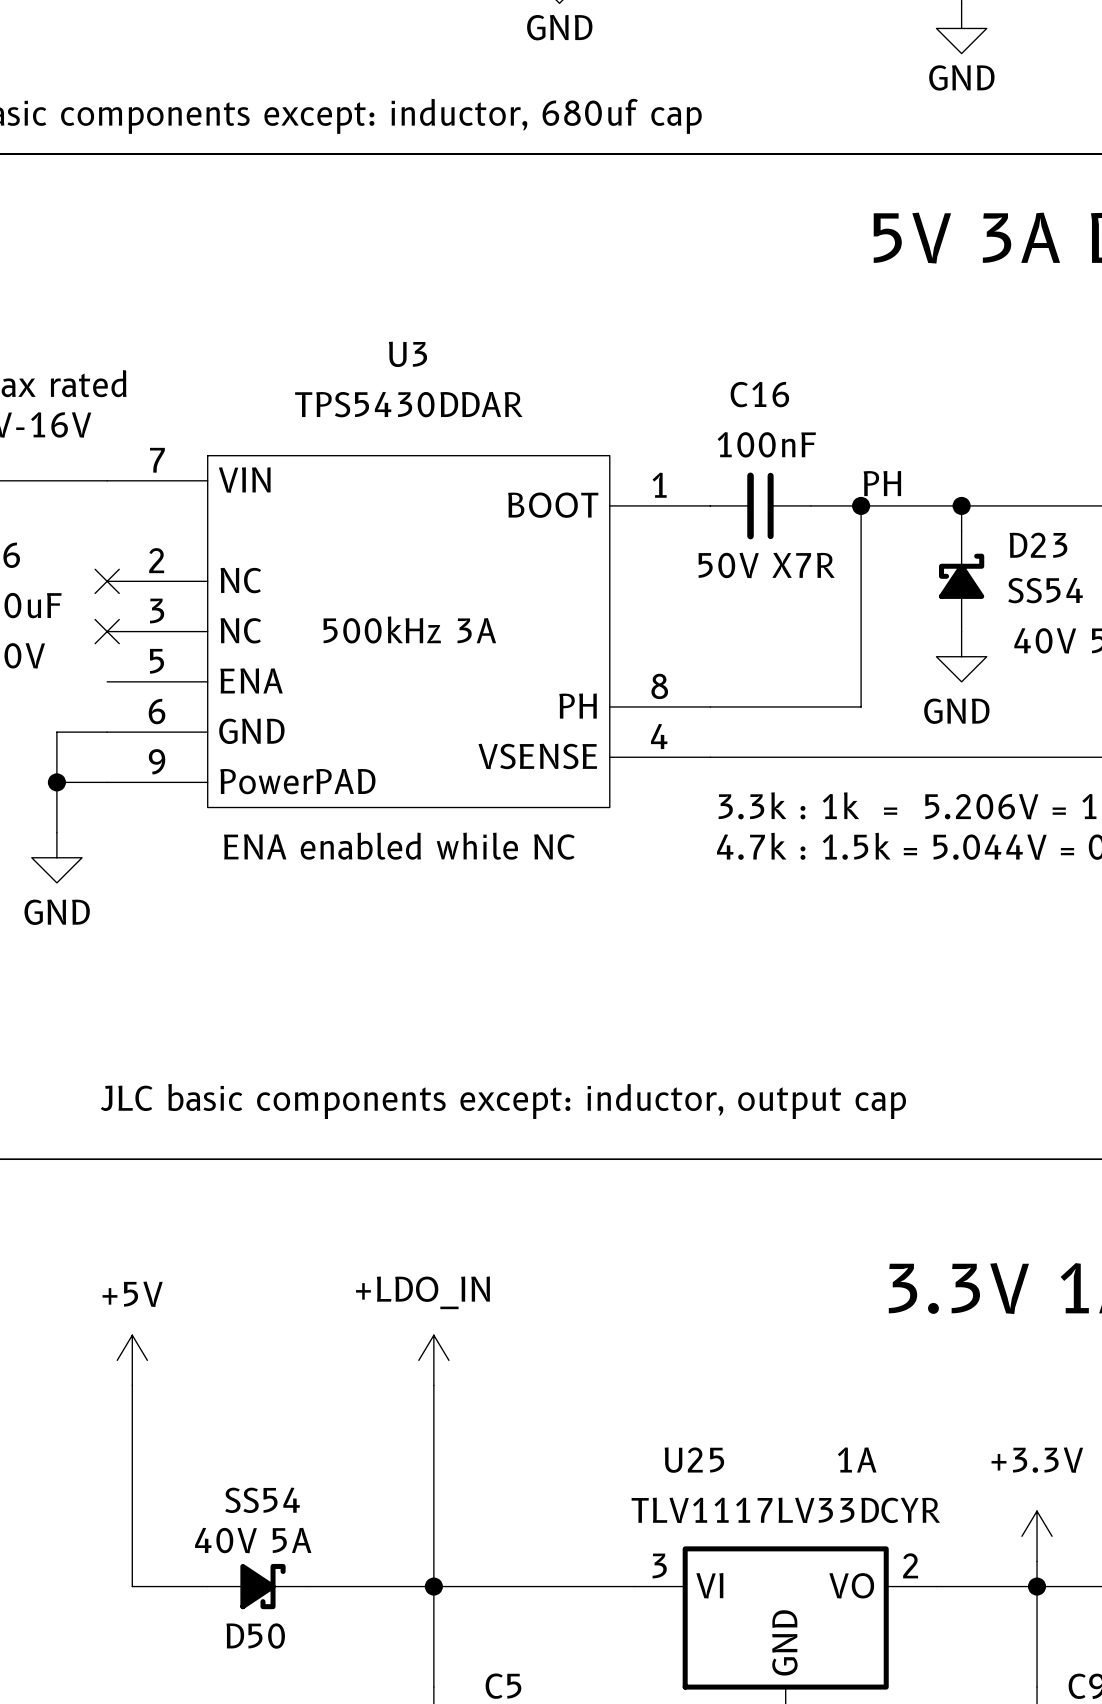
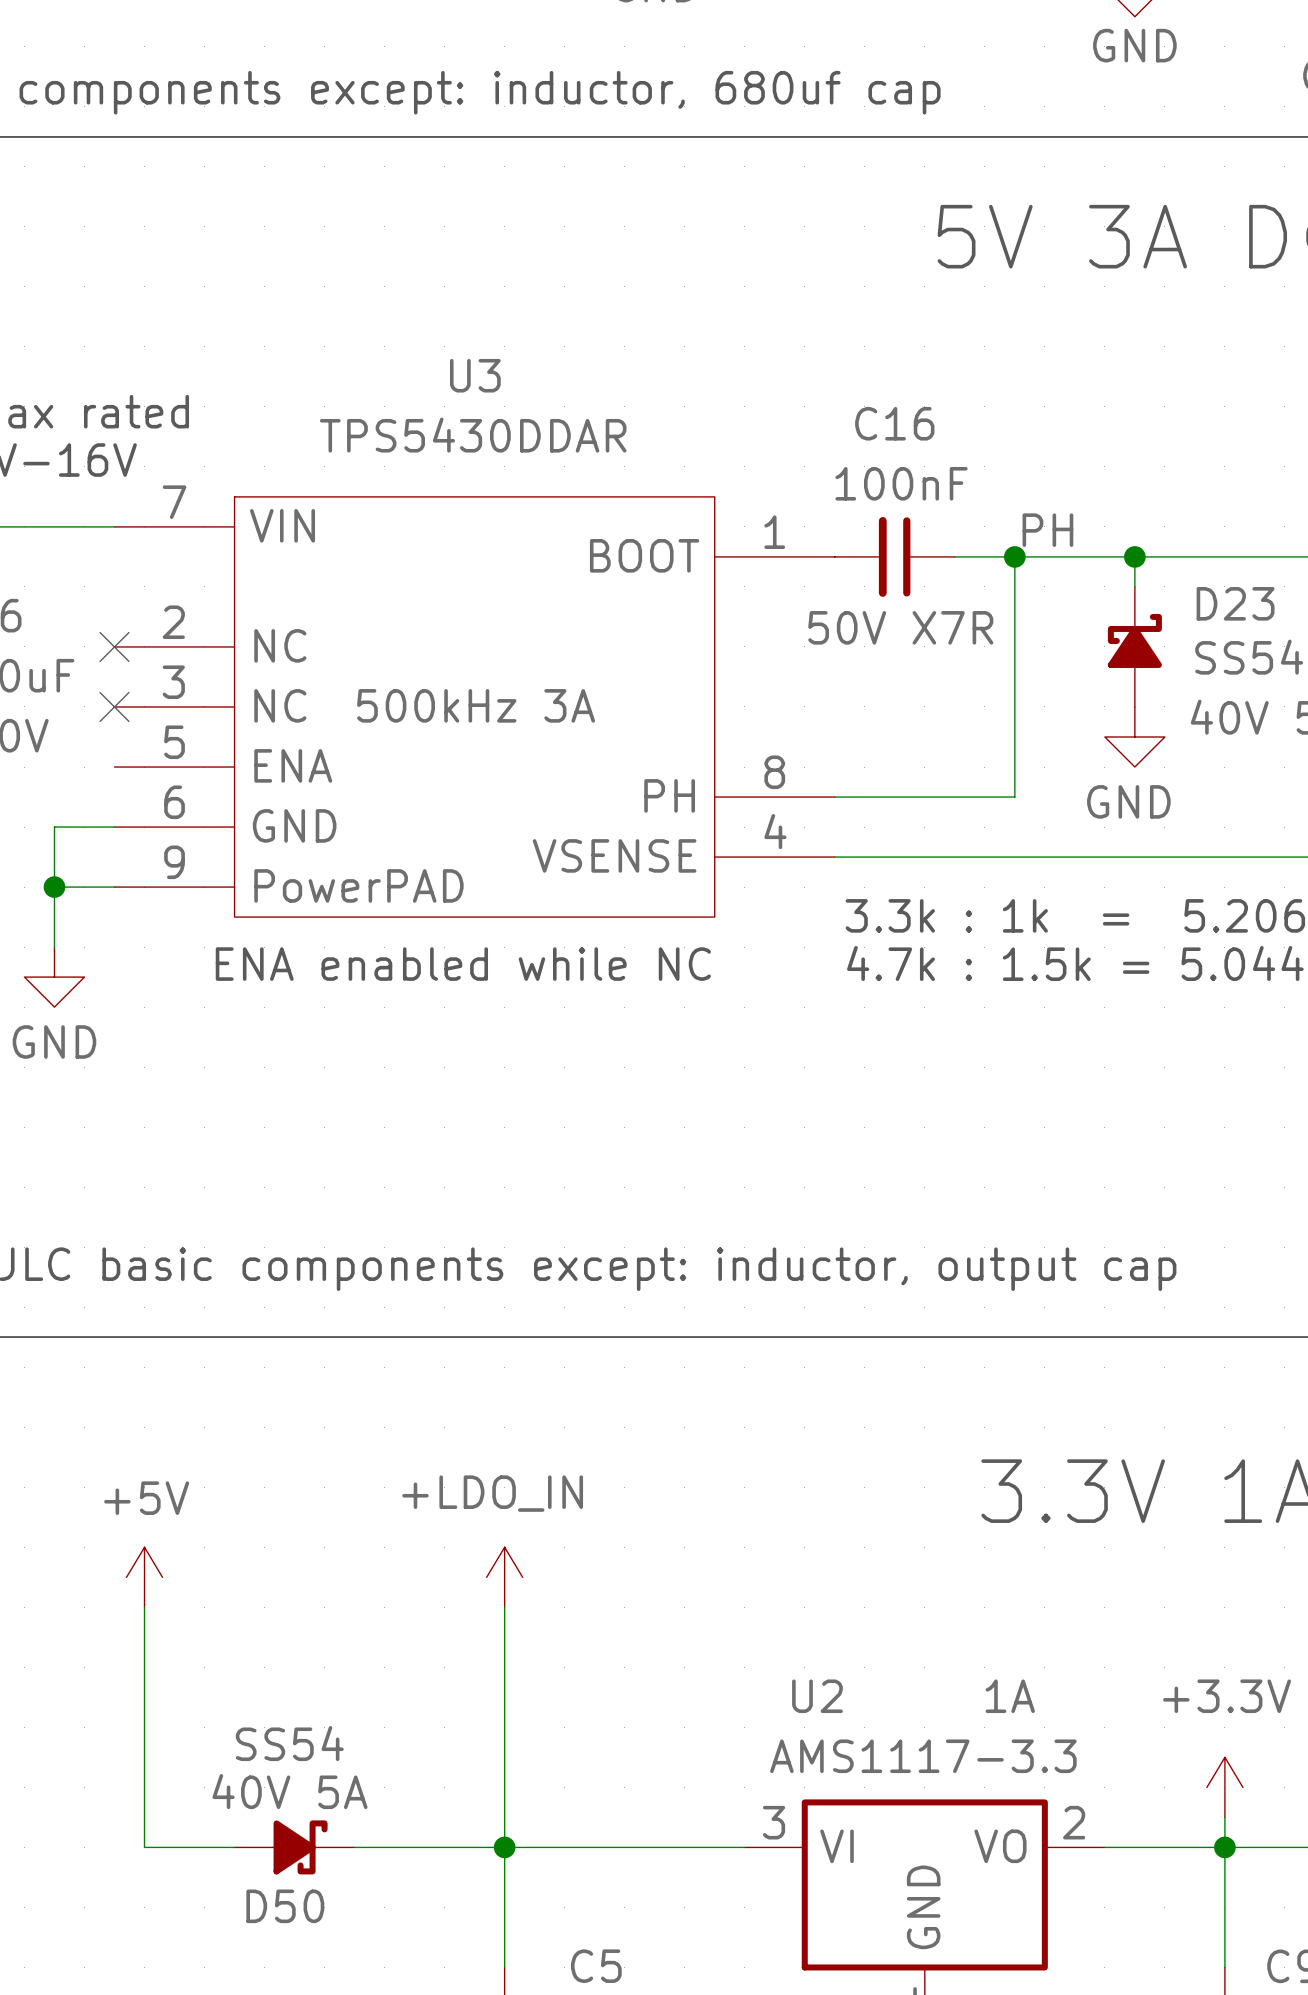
U25 name: U25 (694, 1460) -> U2 (817, 1696)
U25 value: TLV1117LV33DCYR (785, 1510) -> AMS1117-3.3 (923, 1756)

